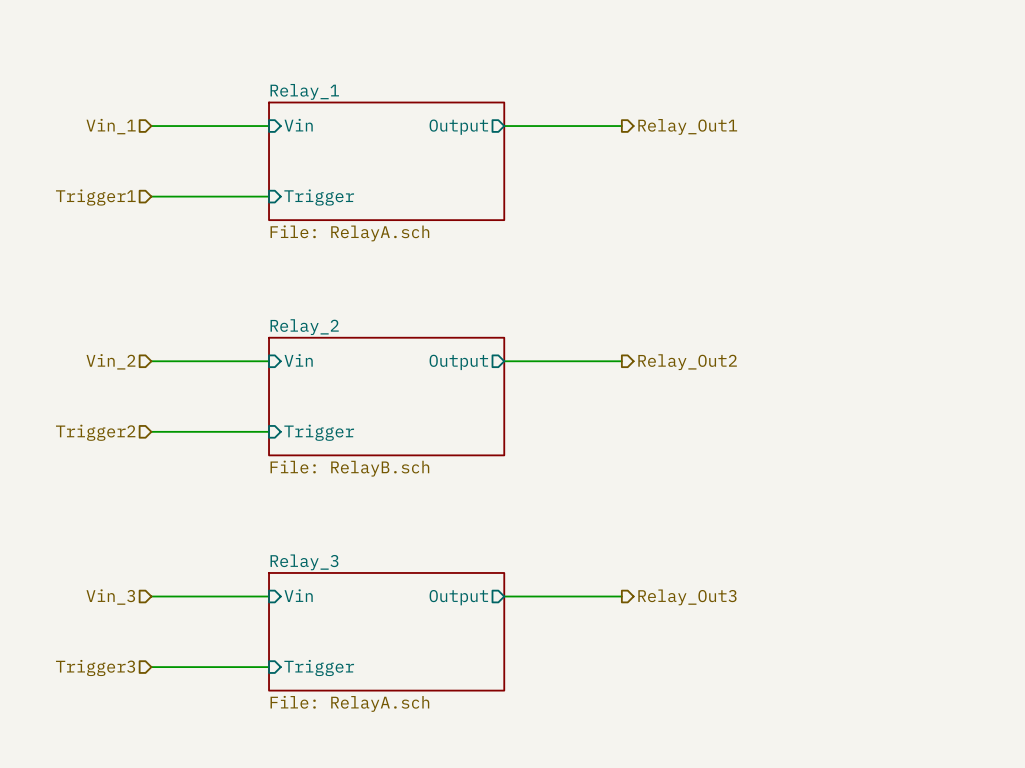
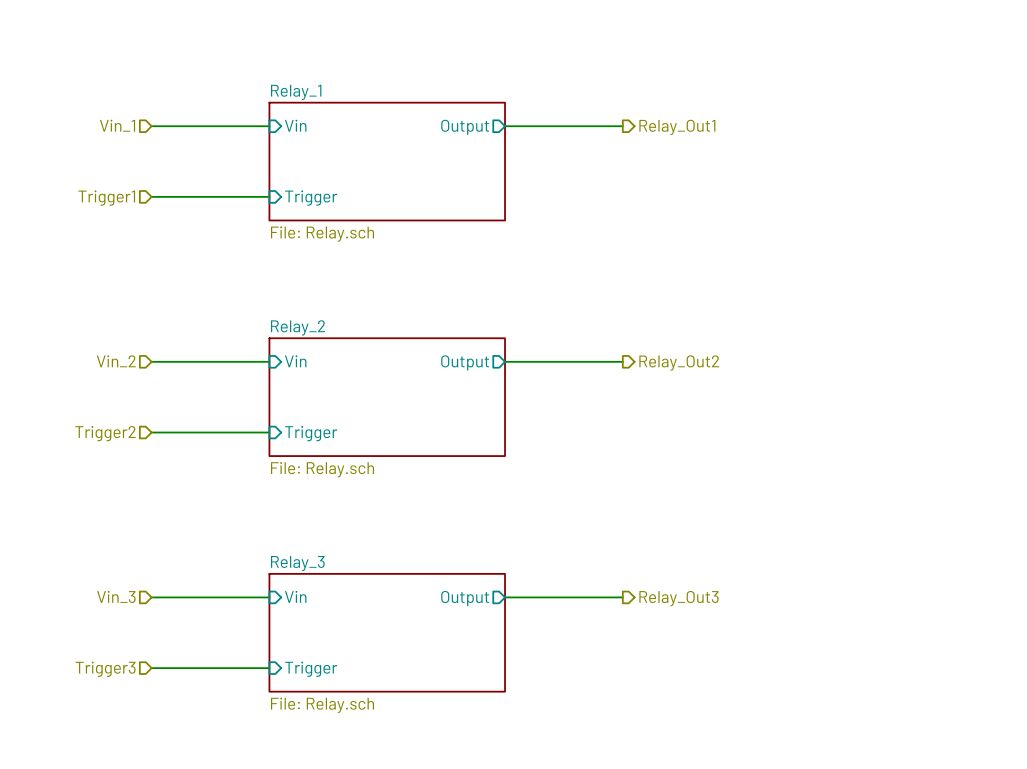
sheet Relay_1 value: File: RelayA.sch (349, 233) -> File: Relay.sch (322, 234)
sheet Relay_2 value: File: RelayB.sch (349, 468) -> File: Relay.sch (322, 469)
sheet Relay_3 value: File: RelayA.sch (349, 703) -> File: Relay.sch (322, 705)

